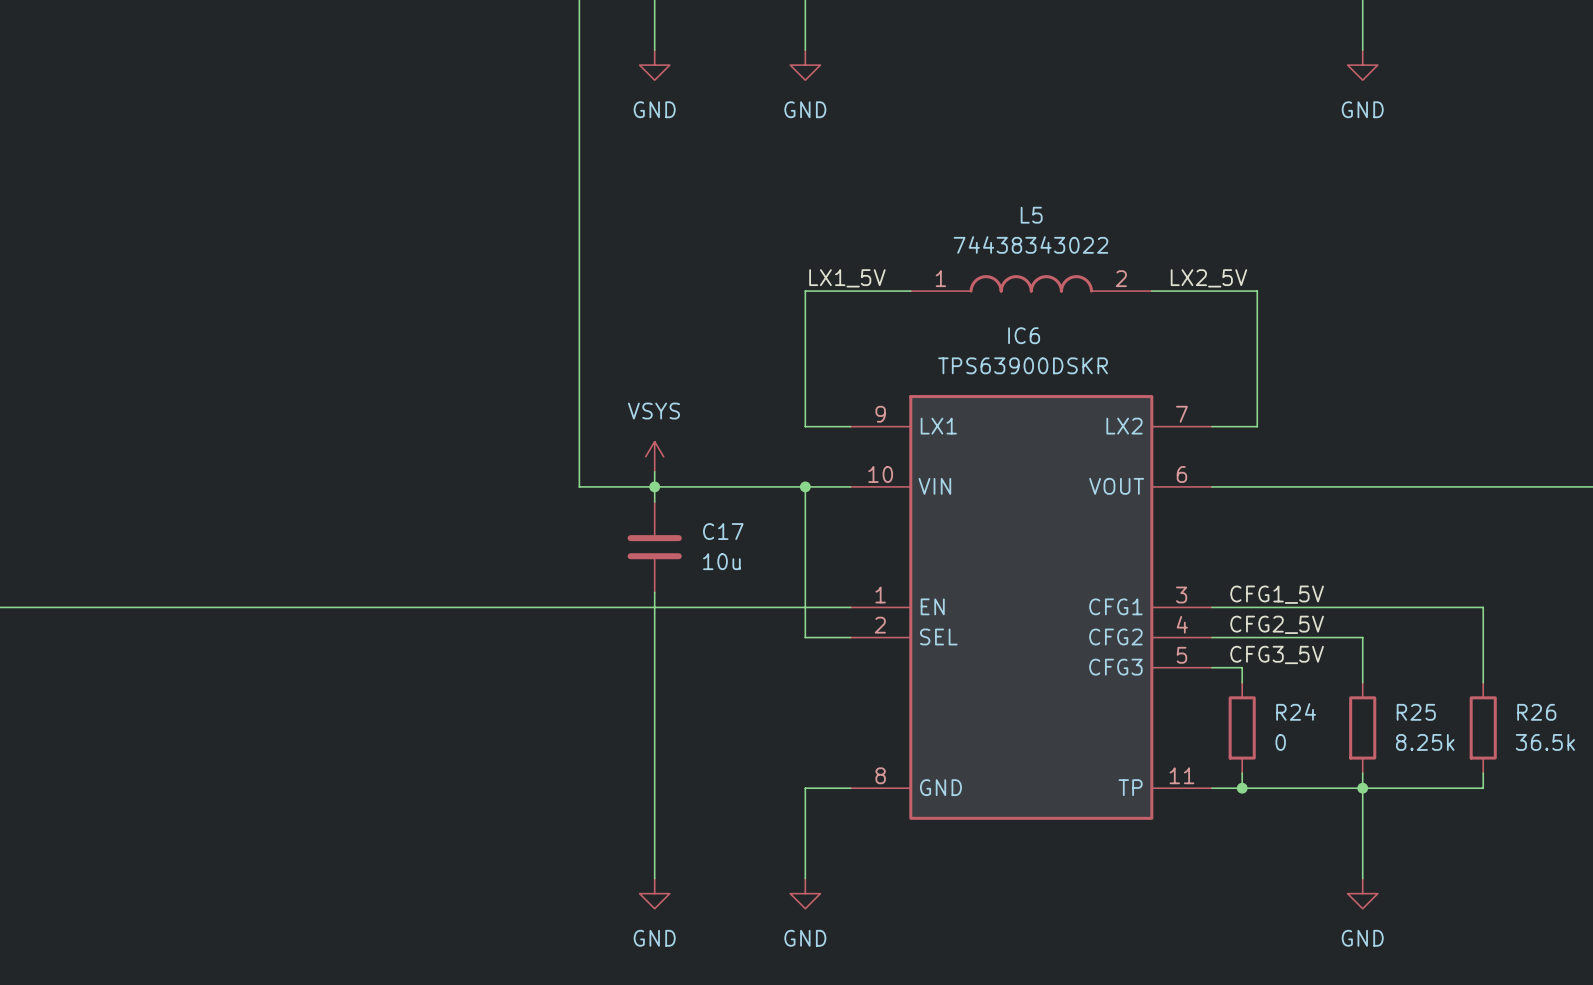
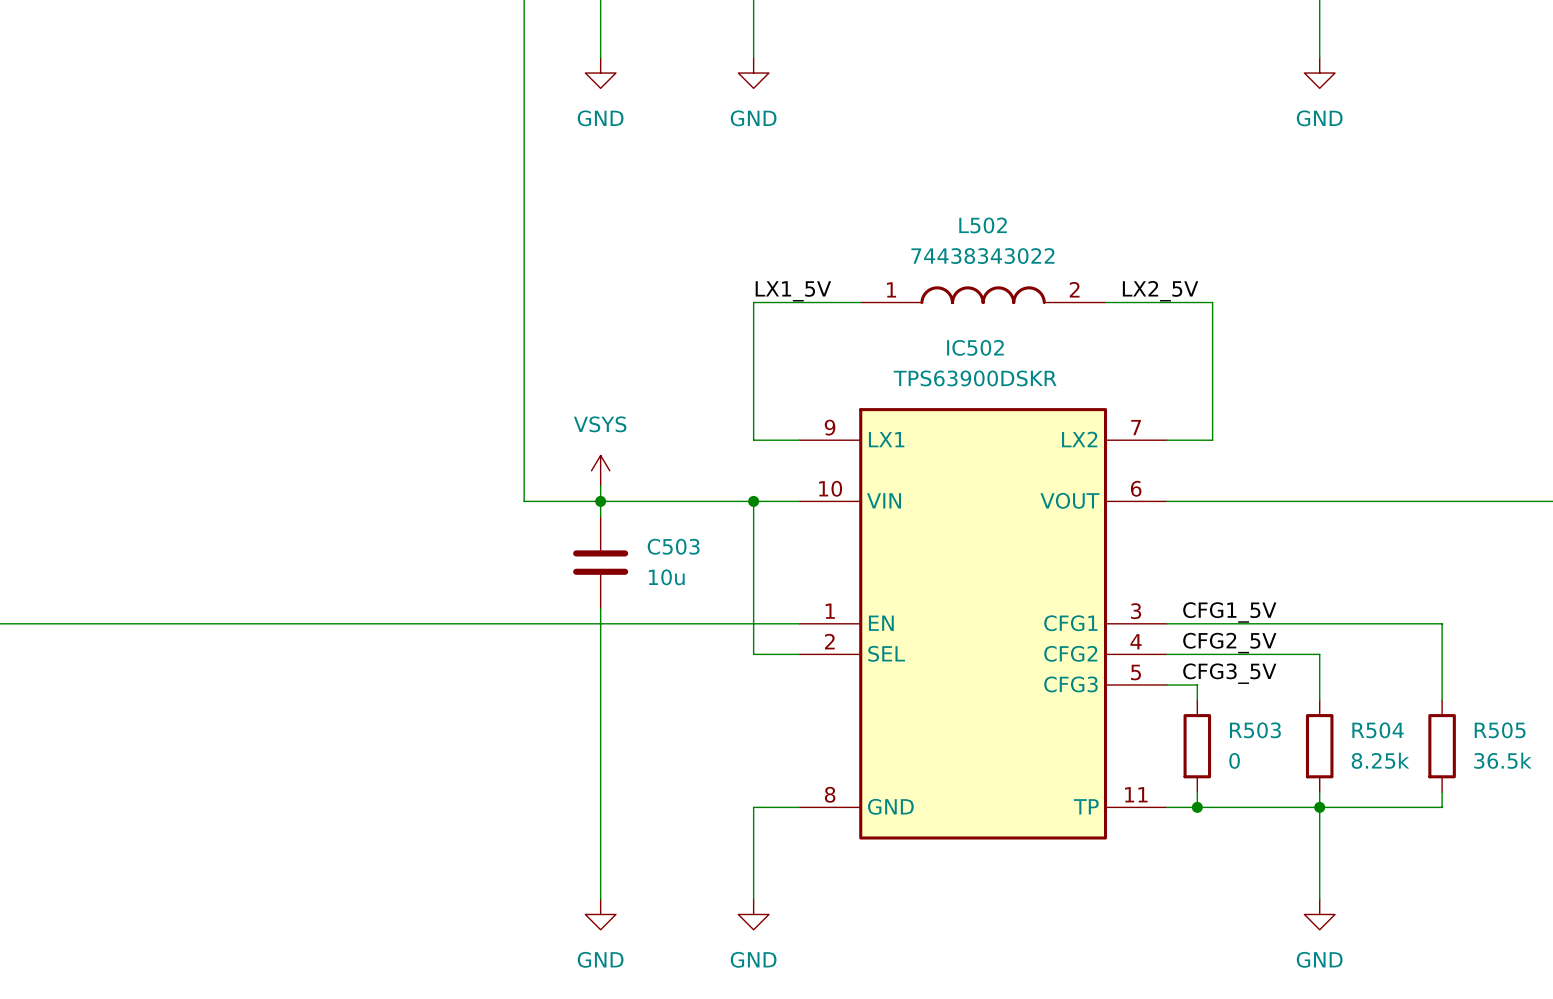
L5 name: L5 (1031, 215) -> L502 (983, 225)
IC6 name: IC6 (1024, 335) -> IC502 (975, 347)
C17 name: C17 (723, 531) -> C503 (673, 546)
R24 name: R24 (1296, 711) -> R503 (1255, 730)
R25 name: R25 (1416, 712) -> R504 (1378, 730)
R26 name: R26 (1536, 712) -> R505 (1500, 730)

